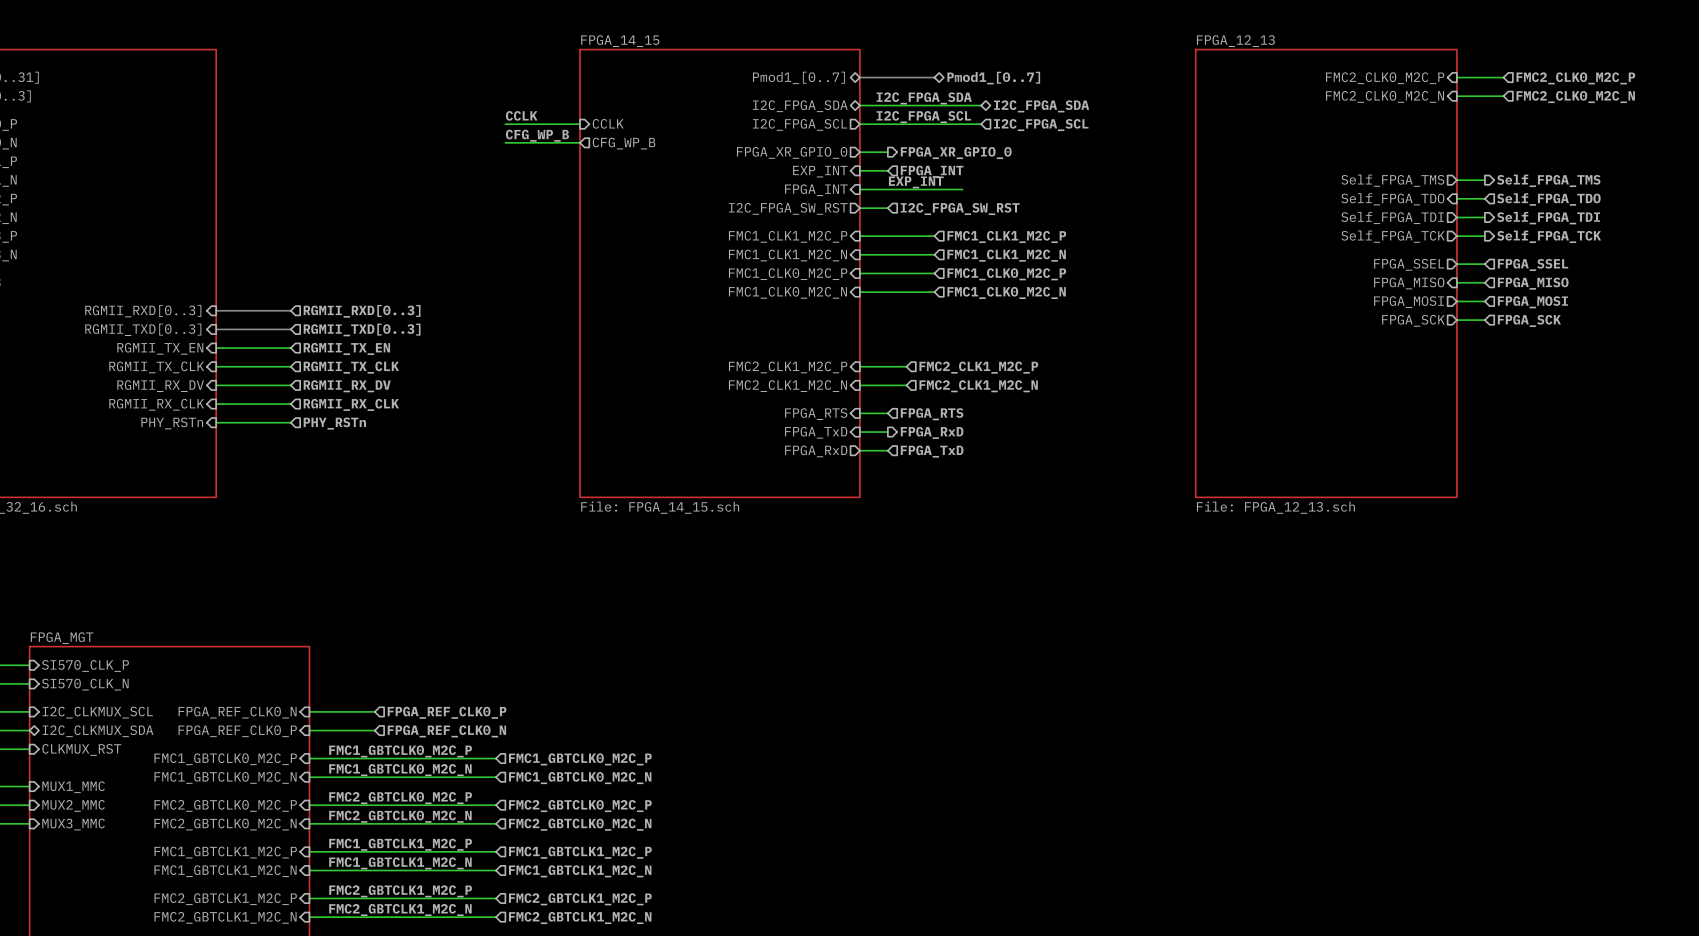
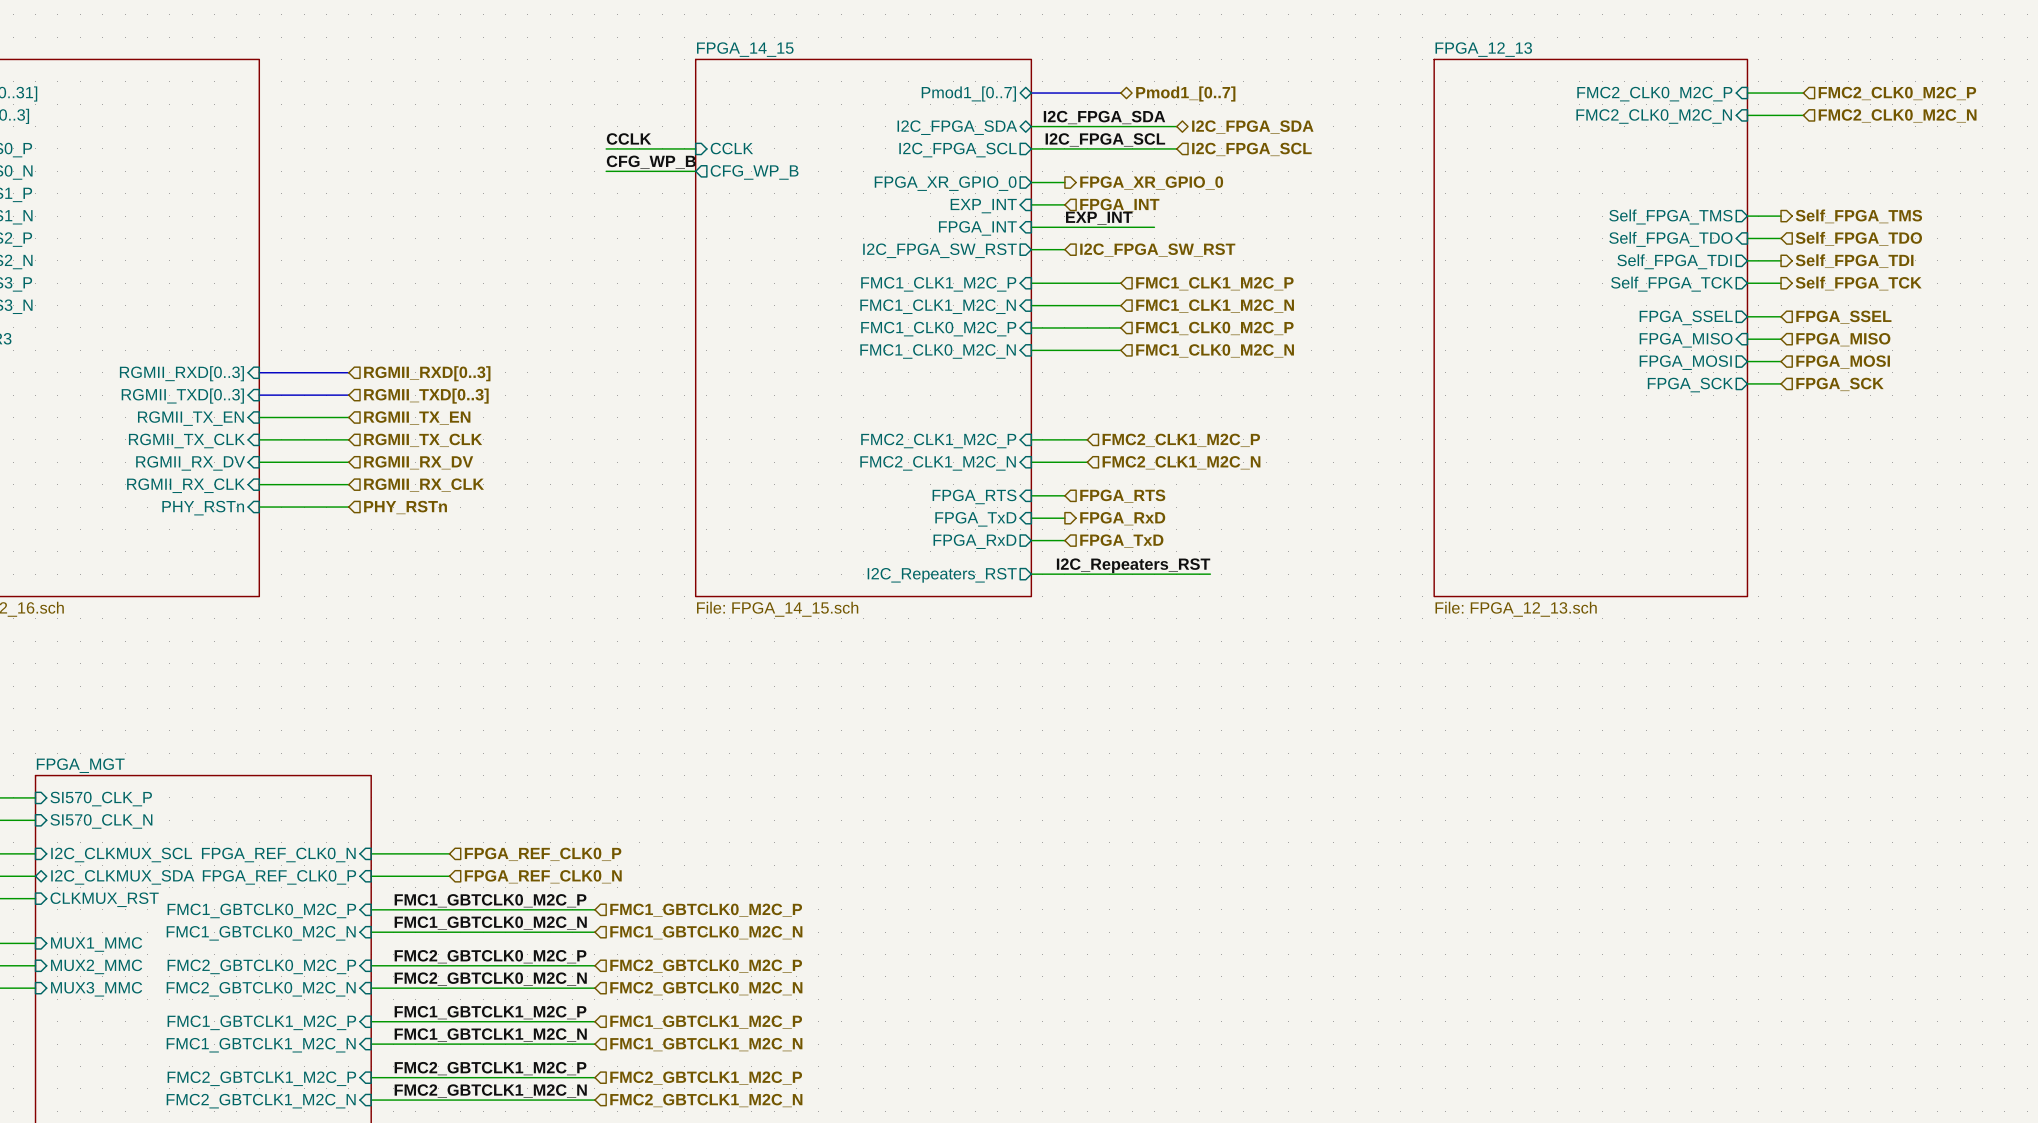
label: none -> I2C_Repeaters_RST (1133, 565)
wire: none -> (1031, 574) (1210, 574)
sheet pin: none -> I2C_Repeaters_RST (942, 575)

